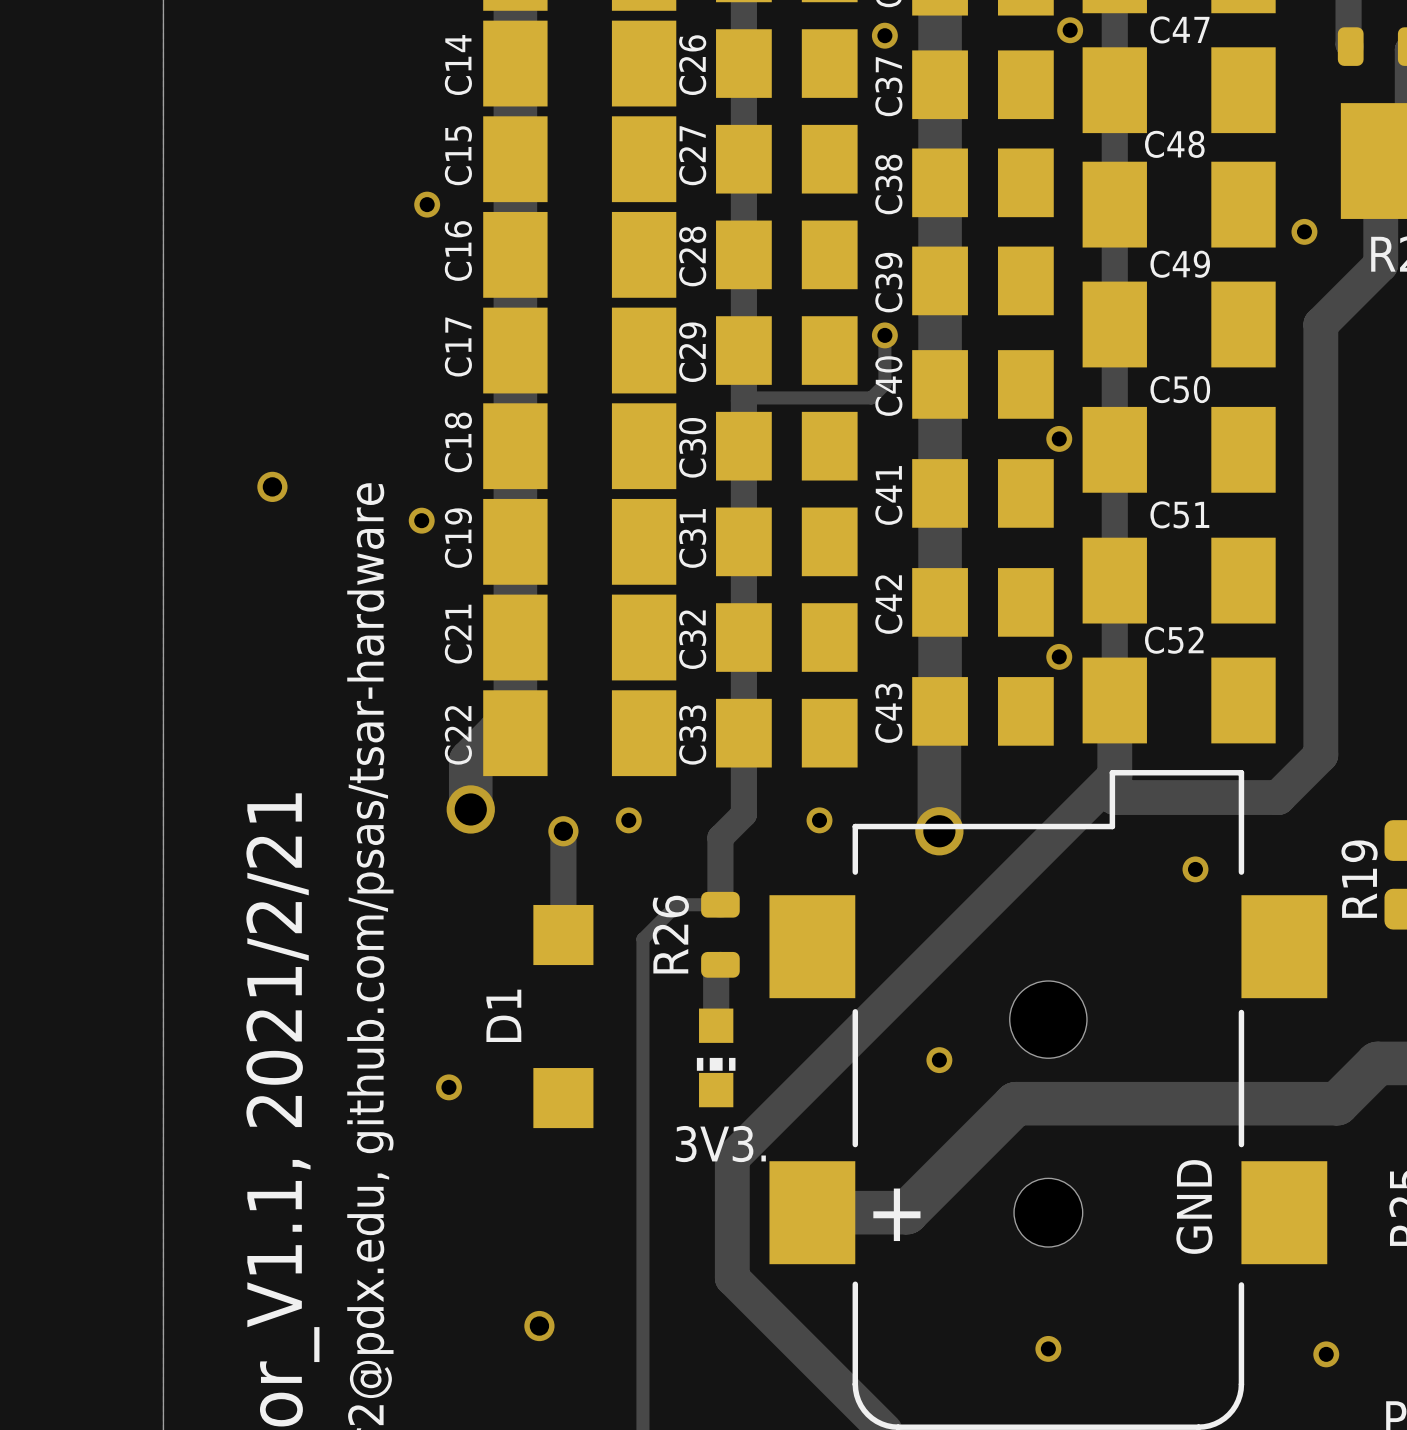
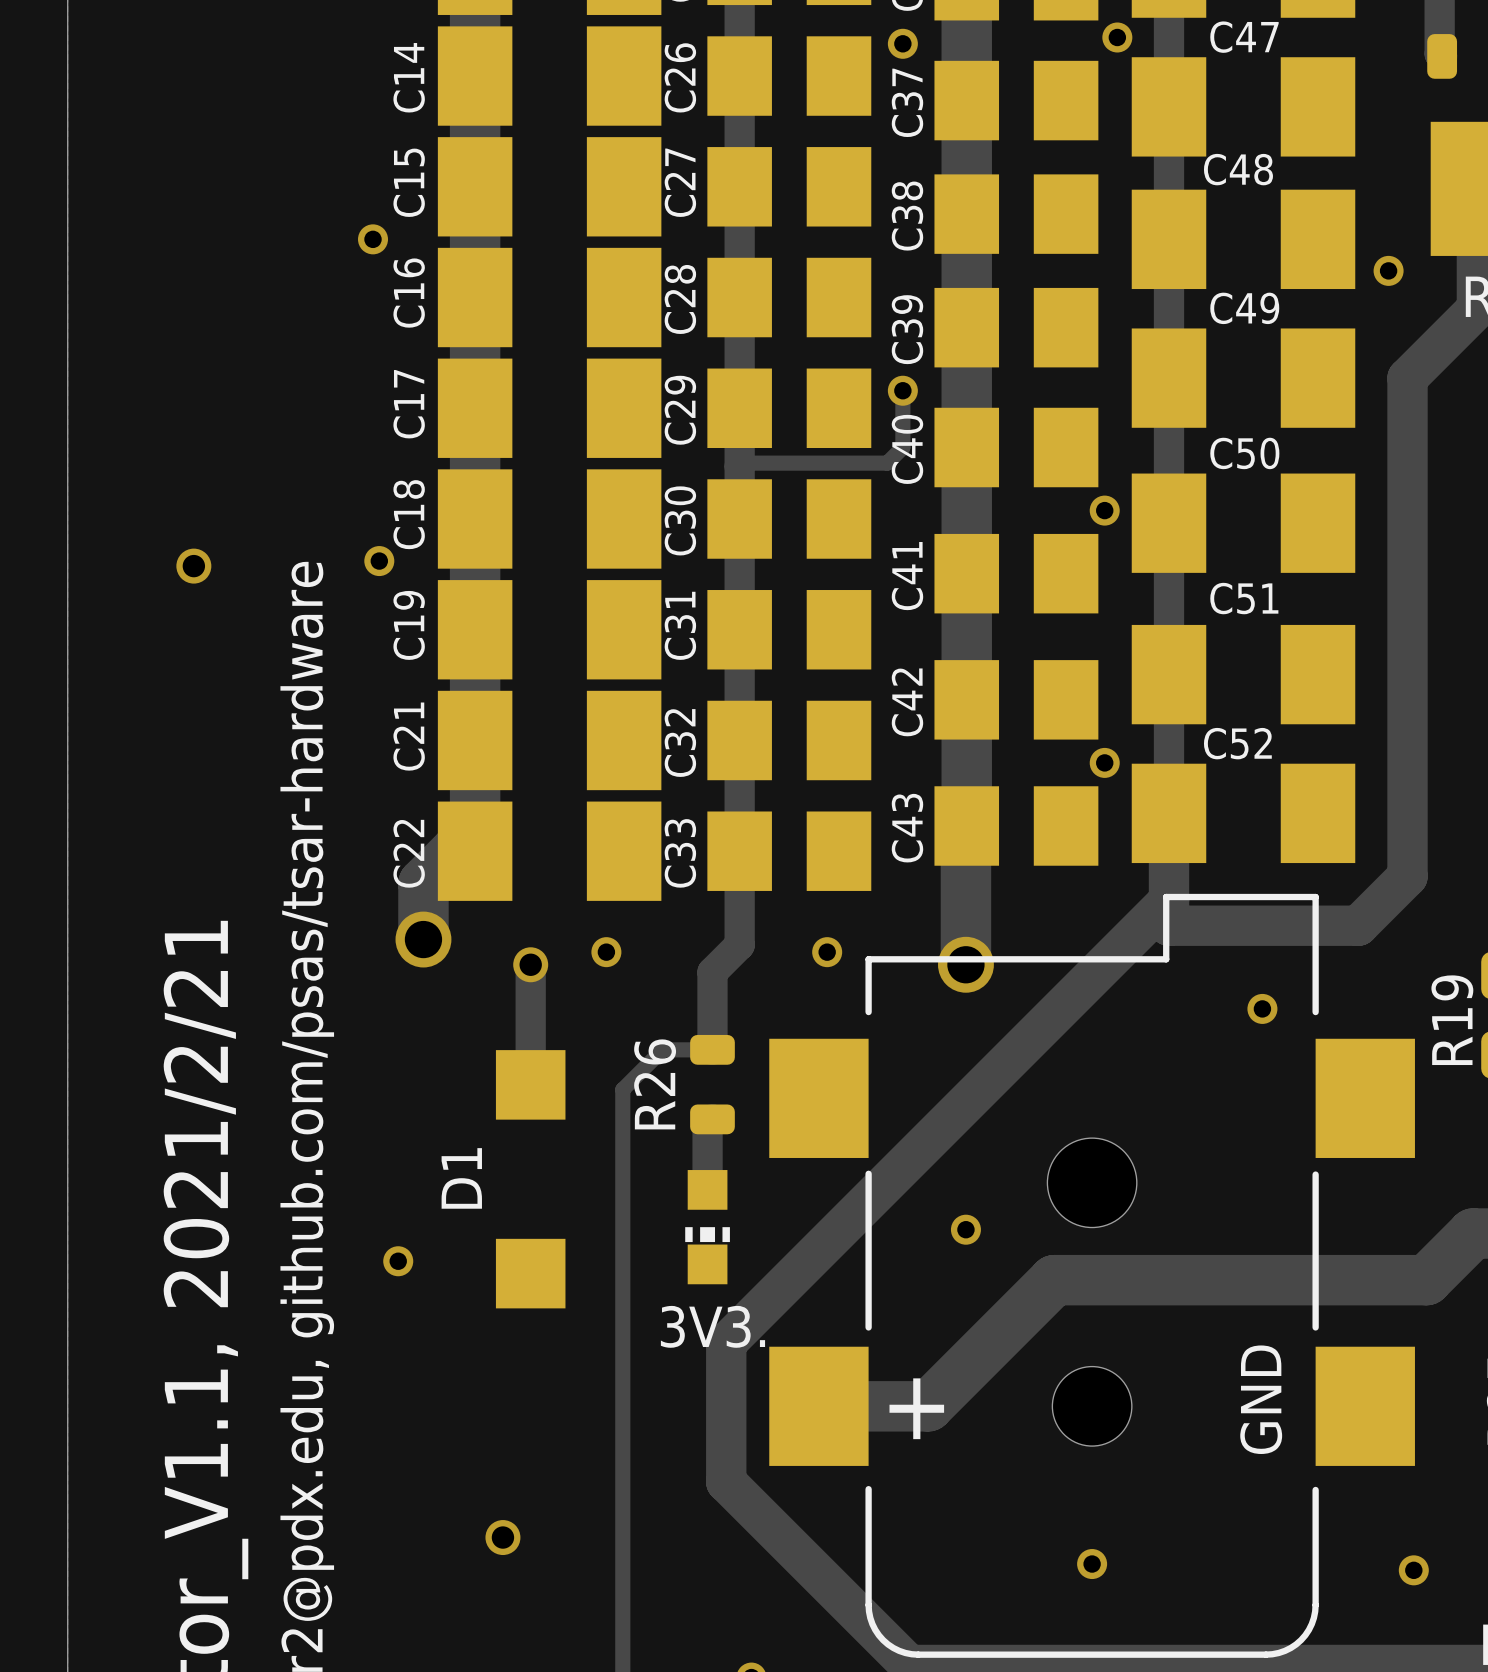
via position: (421, 520) -> (379, 561)

